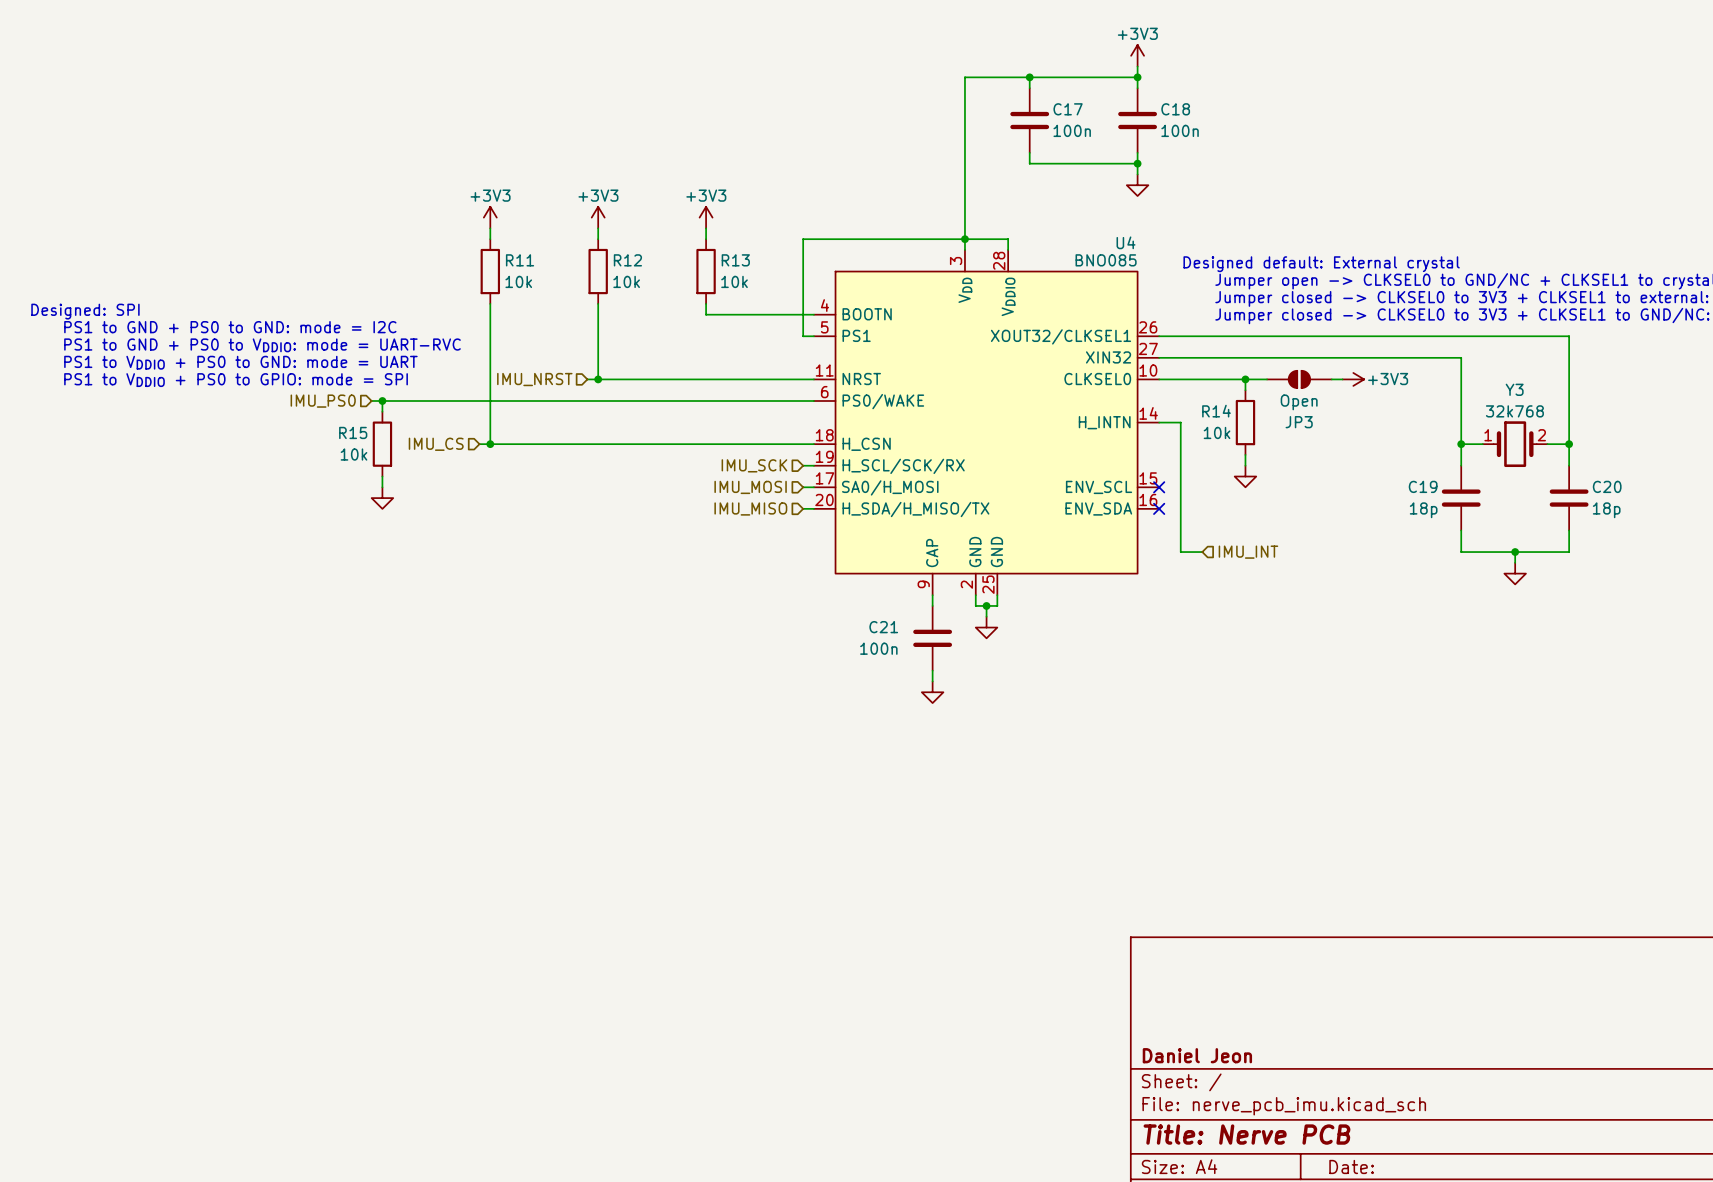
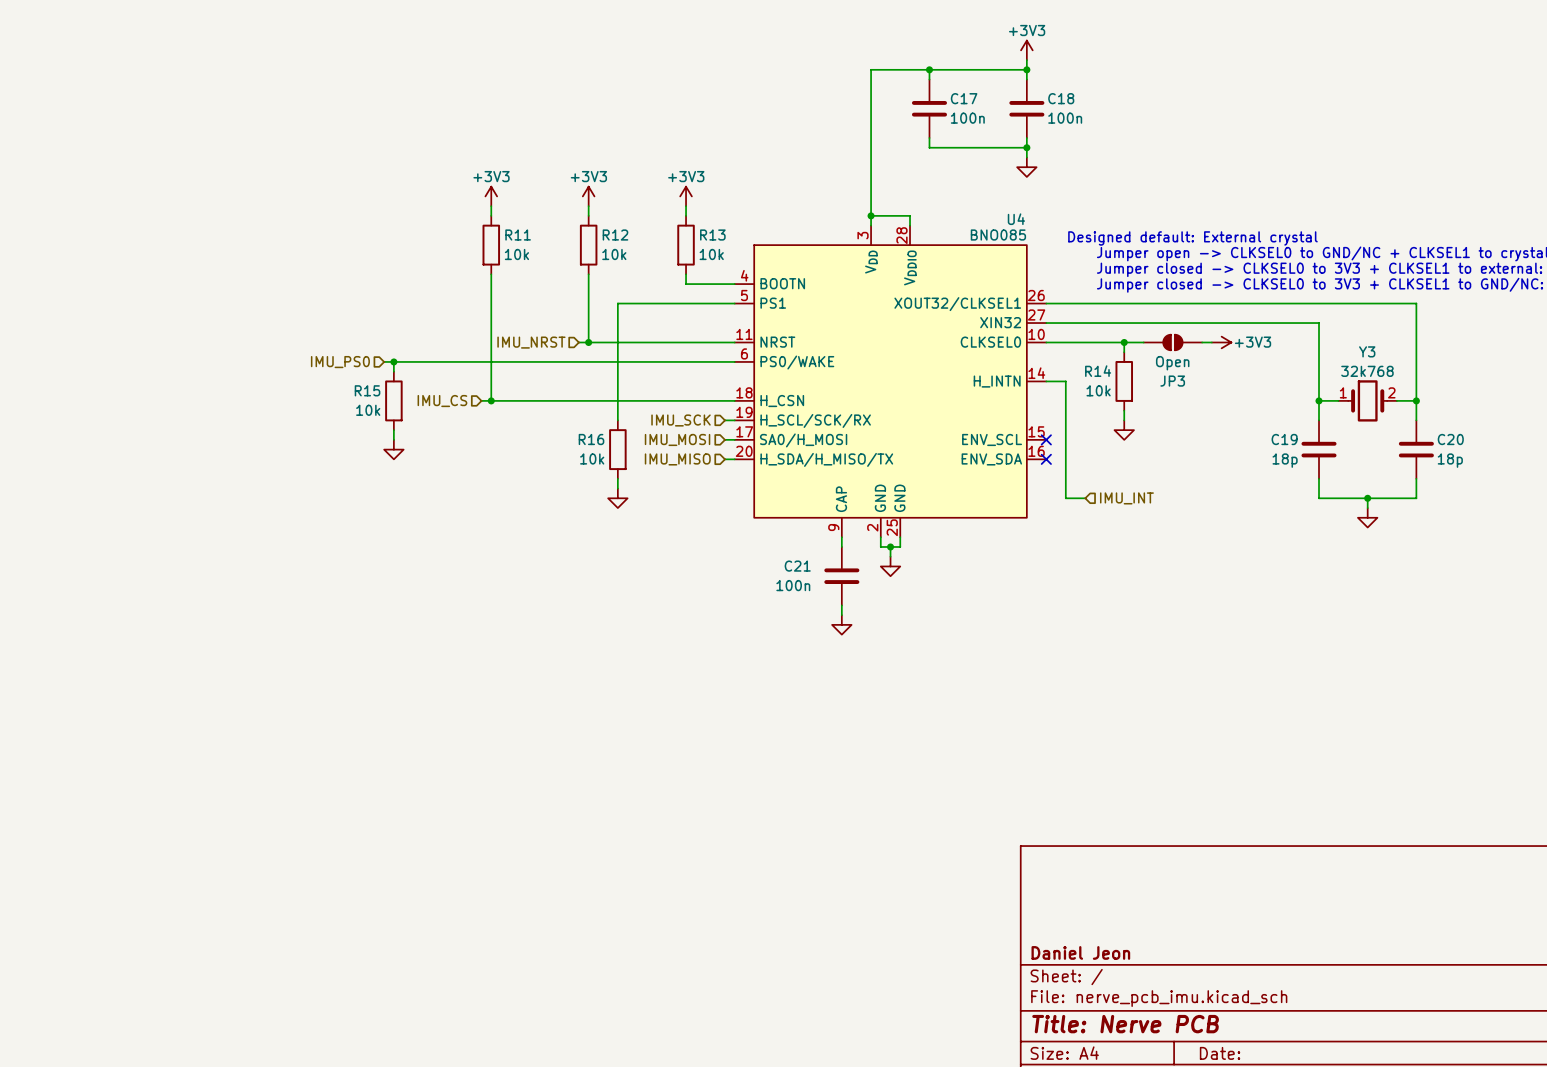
power symbol: +3V3 (490, 217) -> none
power symbol: none -> +3V3 (491, 196)
power symbol: +3V3 (598, 217) -> none
power symbol: none -> +3V3 (588, 196)
power symbol: +3V3 (706, 217) -> none
power symbol: none -> +3V3 (686, 196)
wire: (490, 228) (490, 239) -> (491, 206) (491, 215)
wire: (598, 228) (598, 239) -> (588, 206) (588, 215)
wire: (706, 228) (706, 239) -> (686, 206) (686, 215)
wire: (964, 239) (803, 239) (803, 336) -> (617, 420) (617, 303) (724, 303)
R11 position: (490, 271) -> (491, 245)
R12 position: (598, 271) -> (588, 245)
R13 position: (706, 271) -> (686, 245)
wire: (490, 303) (490, 444) -> (491, 274) (491, 400)
wire: (598, 303) (598, 379) -> (588, 274) (588, 342)
wire: (706, 303) (706, 314) (760, 314) -> (686, 274) (686, 284)
text: Designed: SPI (85, 311) -> none
text: PS1 to GND + PS0 to GND: mode = I2C (230, 327) -> none
text: PS1 to GND + PS0 to VDDIO: mode = UART-RVC (262, 345) -> none
text: PS1 to VDDIO + PS0 to GND: mode = UART (240, 362) -> none
hierarchical label position: IMU_NRST (534, 379) -> IMU_NRST (531, 342)
wire: (587, 379) (641, 379) -> none
junction: (598, 379) -> none
junction: none -> (588, 342)
text: PS1 to VDDIO + PS0 to GPIO: mode = SPI (236, 380) -> none
hierarchical label position: IMU_PS0 (323, 401) -> IMU_PS0 (340, 362)
wire: (371, 401) (425, 401) -> none
wire: (382, 401) (382, 411) -> (393, 361) (393, 371)
junction: (382, 401) -> none
junction: none -> (393, 361)
R15 position: (382, 444) -> (393, 400)
hierarchical label position: IMU_CS (436, 444) -> IMU_CS (442, 401)
wire: (479, 444) (533, 444) -> none
junction: (490, 444) -> none
junction: none -> (491, 400)
wire: (382, 476) (382, 487) -> (393, 430) (393, 439)
power symbol position: (382, 498) -> (393, 449)
R16: none -> 10k (617, 449)
wire: none -> (617, 478) (617, 488)
power symbol: none -> (617, 498)

